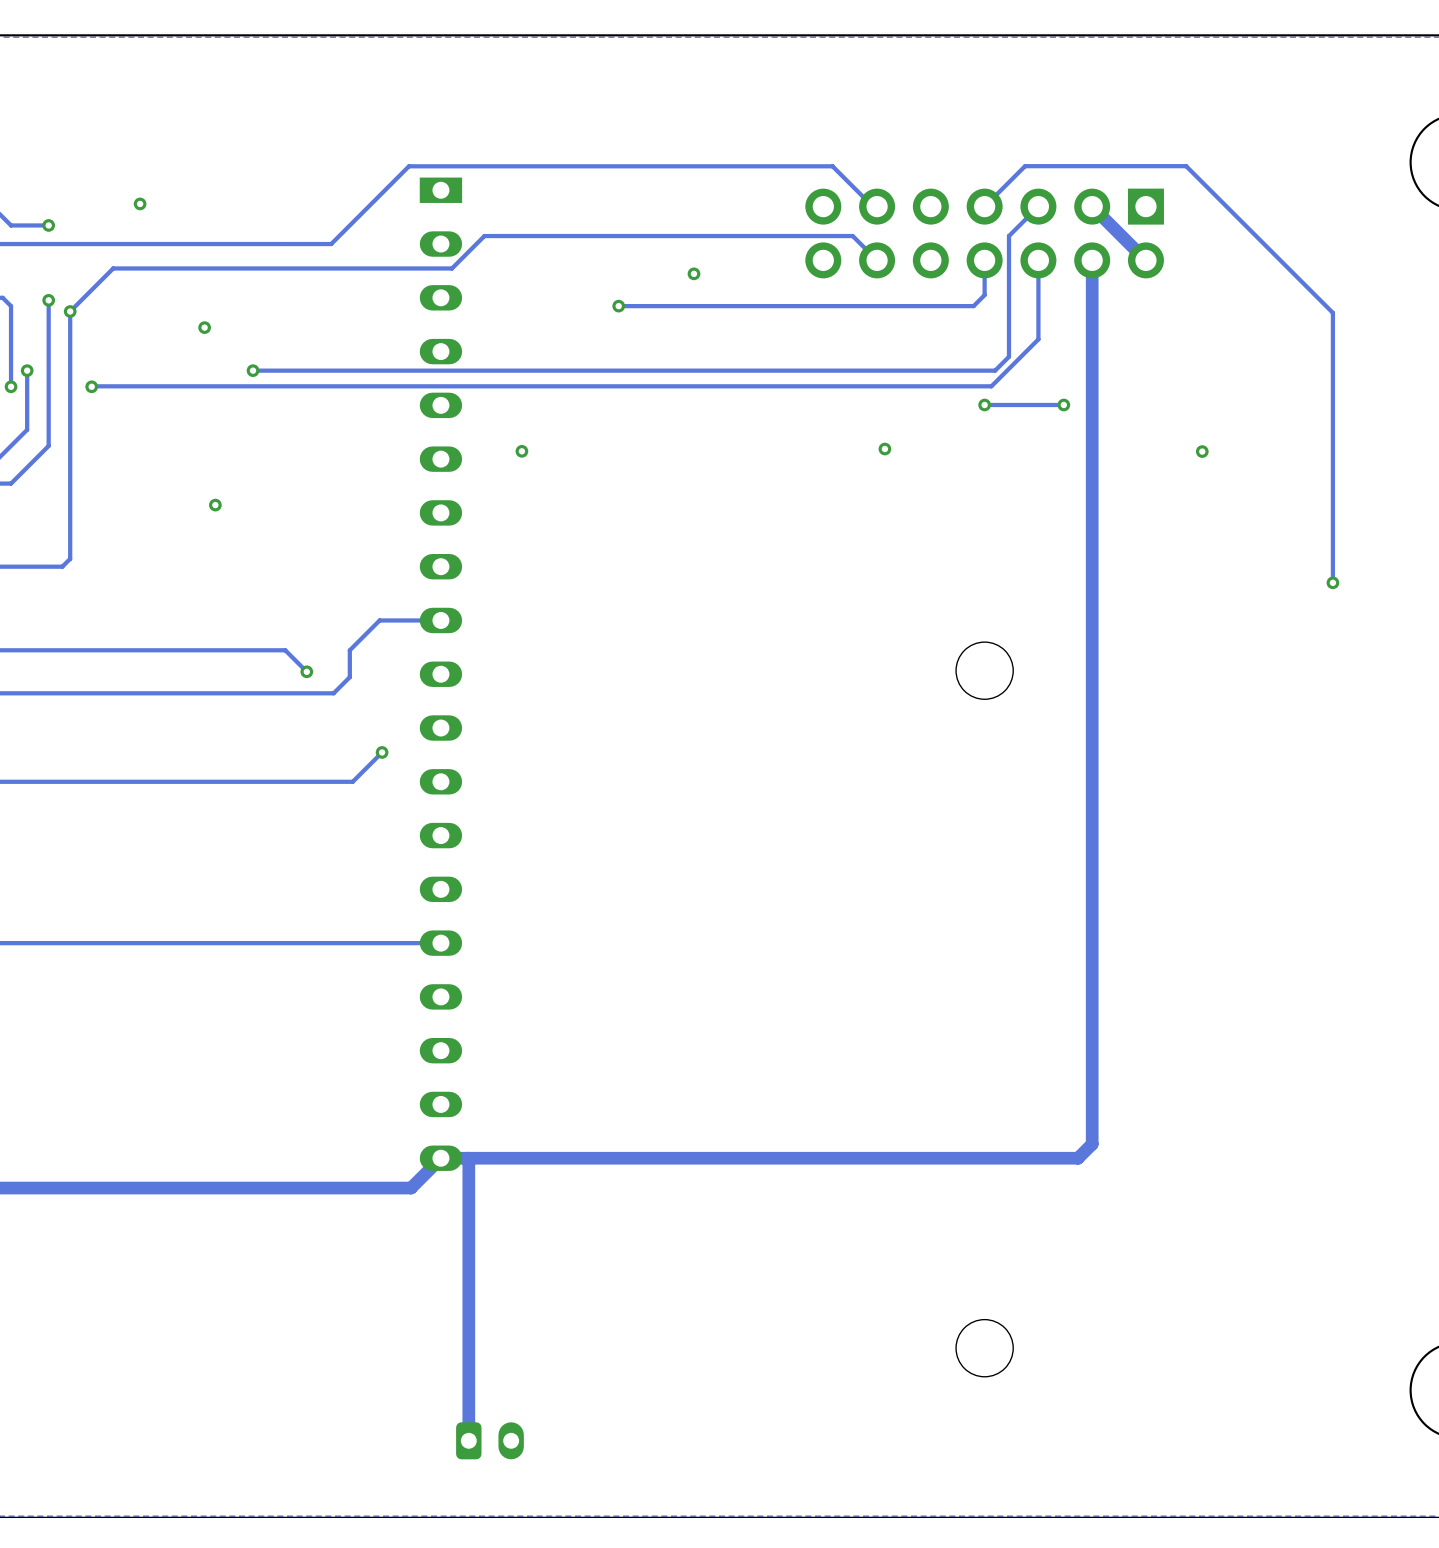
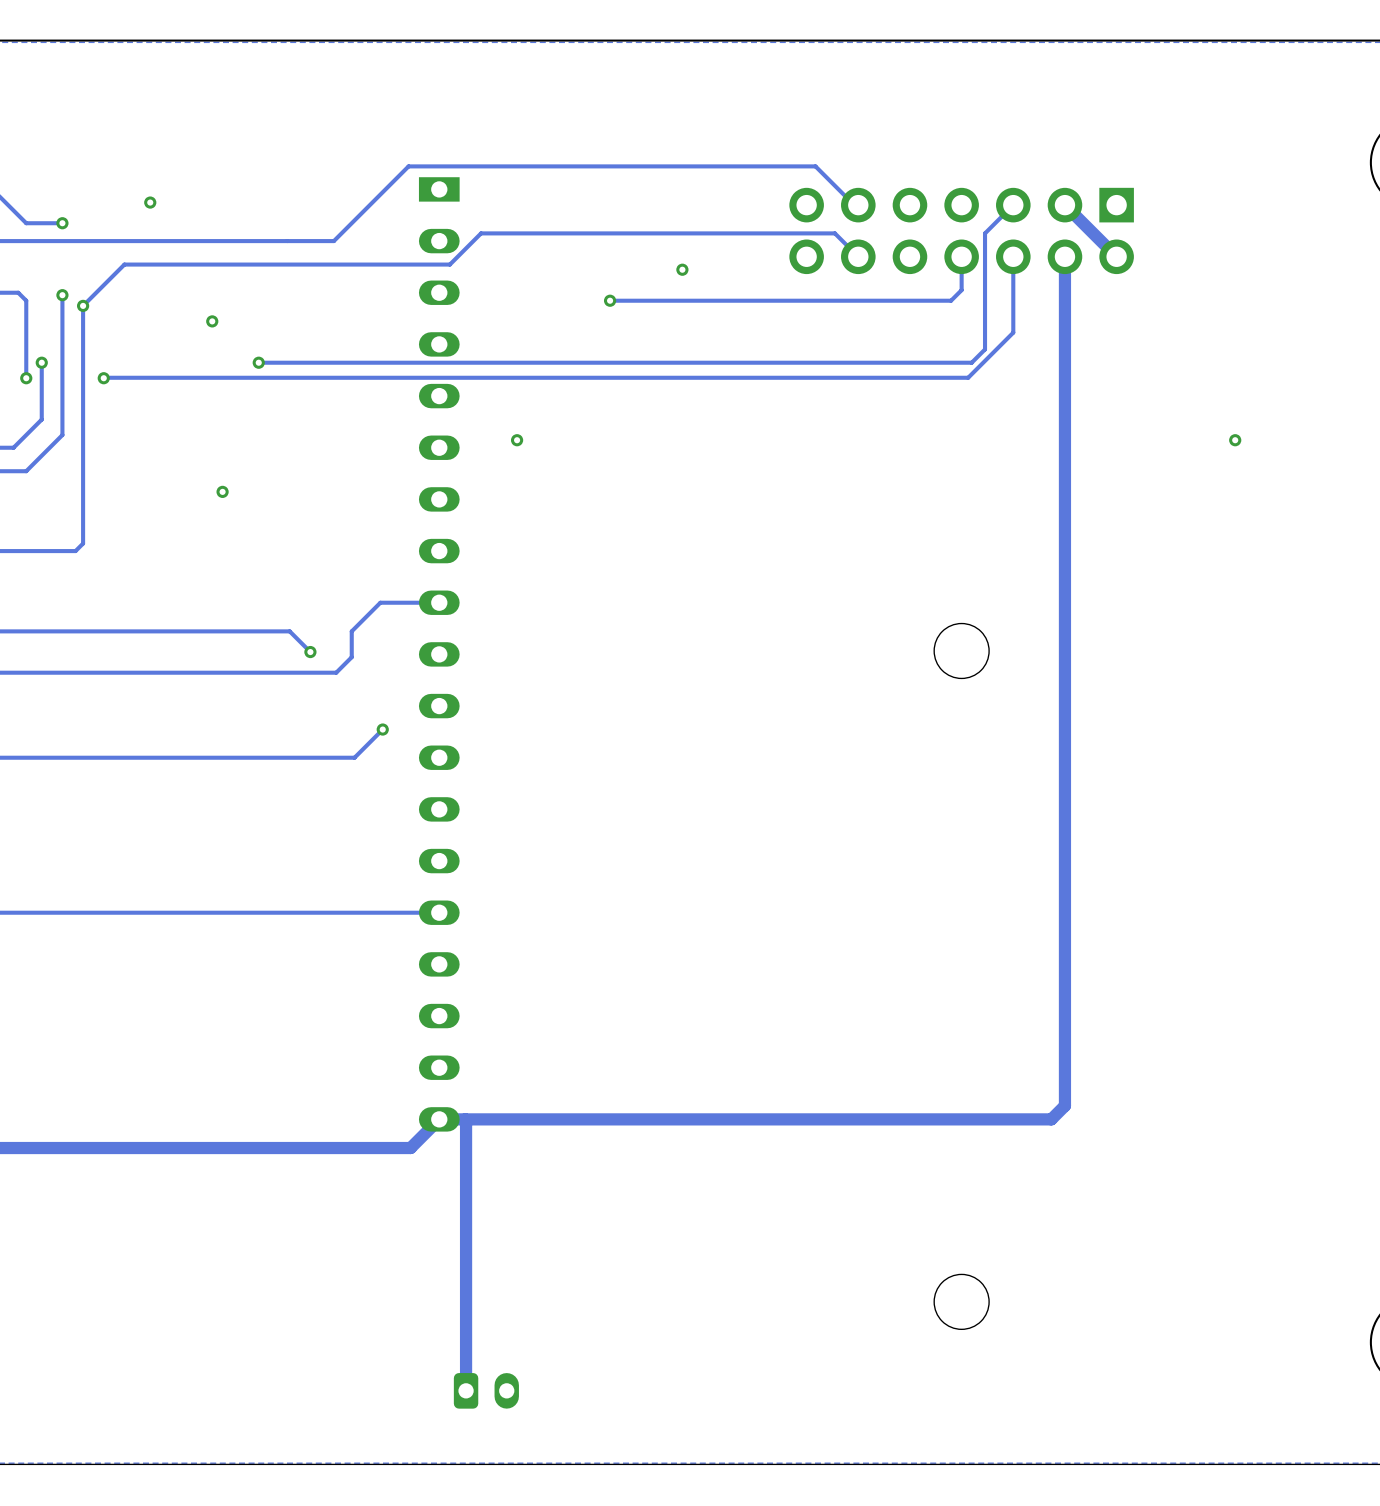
track: (984, 206) (1025, 166) (1186, 166) (1332, 312) (1332, 582) -> none
via: (984, 404) -> none
track: (1063, 404) (984, 404) -> none
via: (1063, 404) -> none
via: (884, 449) -> none
via position: (1202, 451) -> (1235, 440)
via: (1332, 582) -> none

